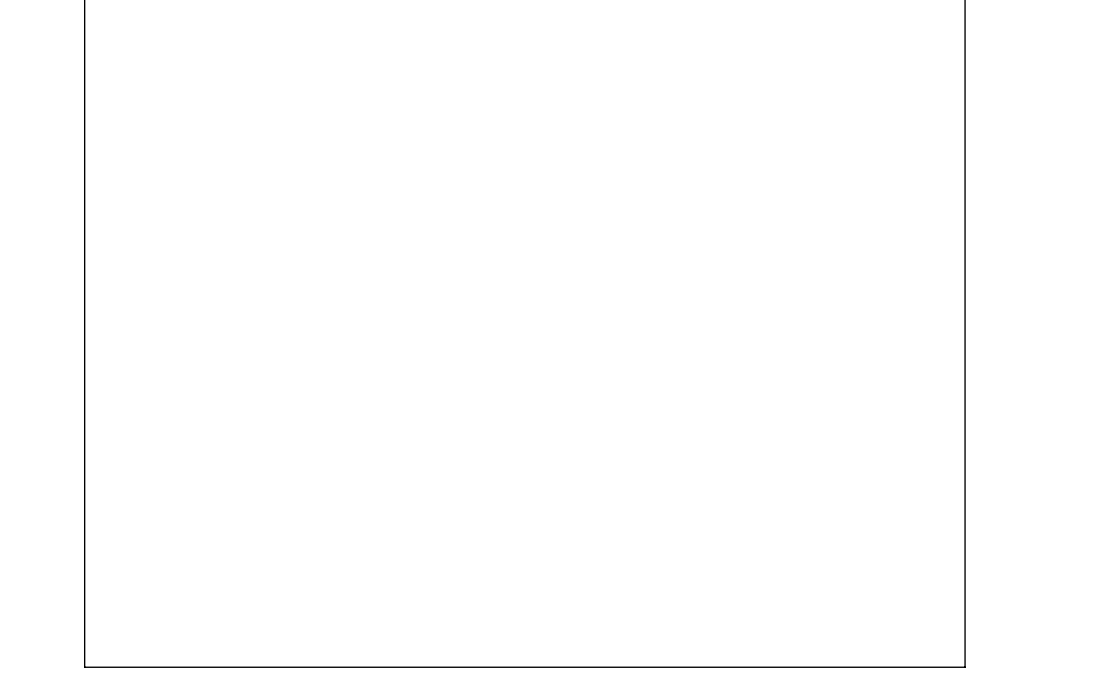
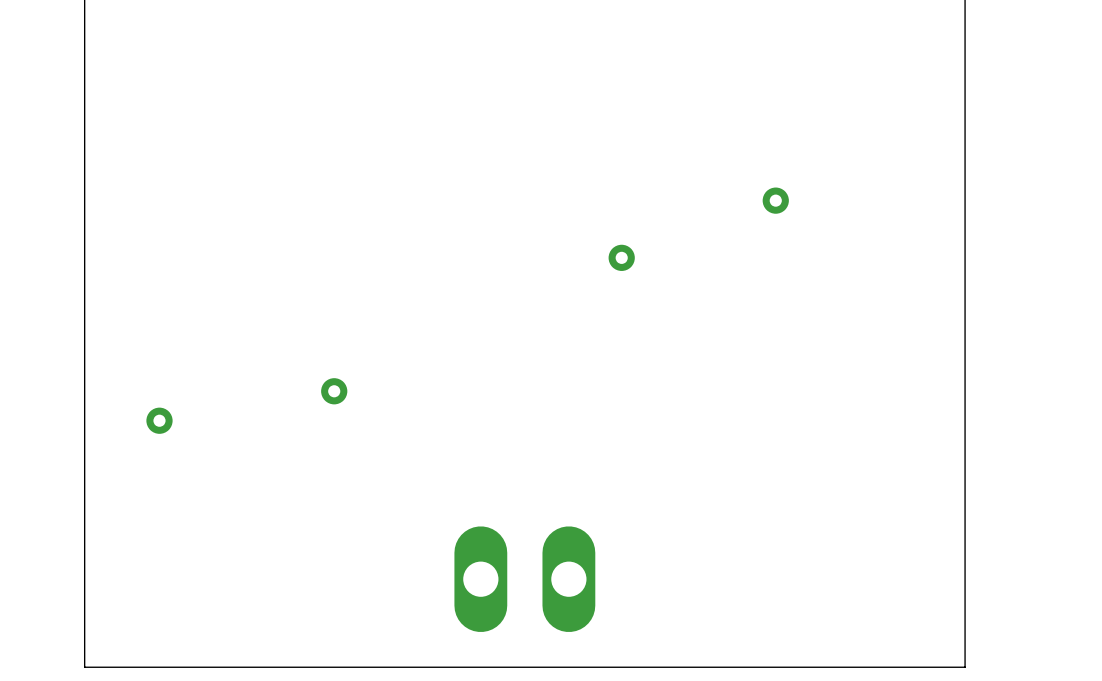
via: none -> (775, 200)
via: none -> (621, 257)
via: none -> (334, 391)
via: none -> (159, 420)
part: none -> (524, 579)

